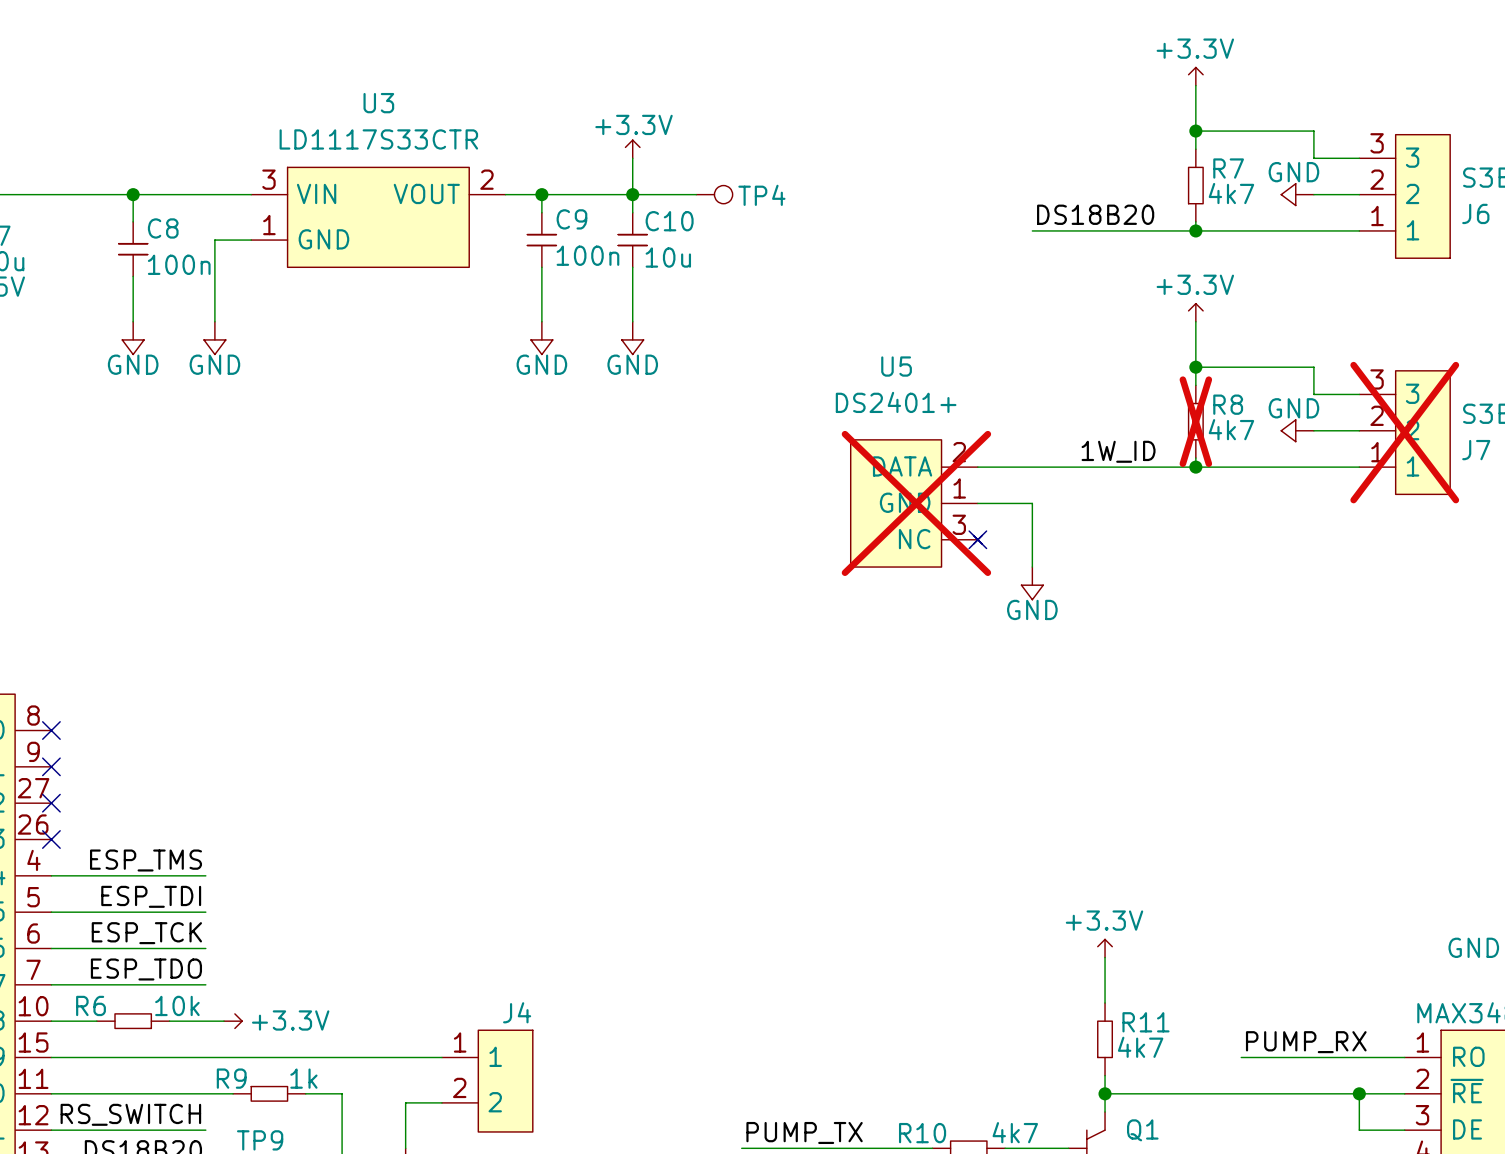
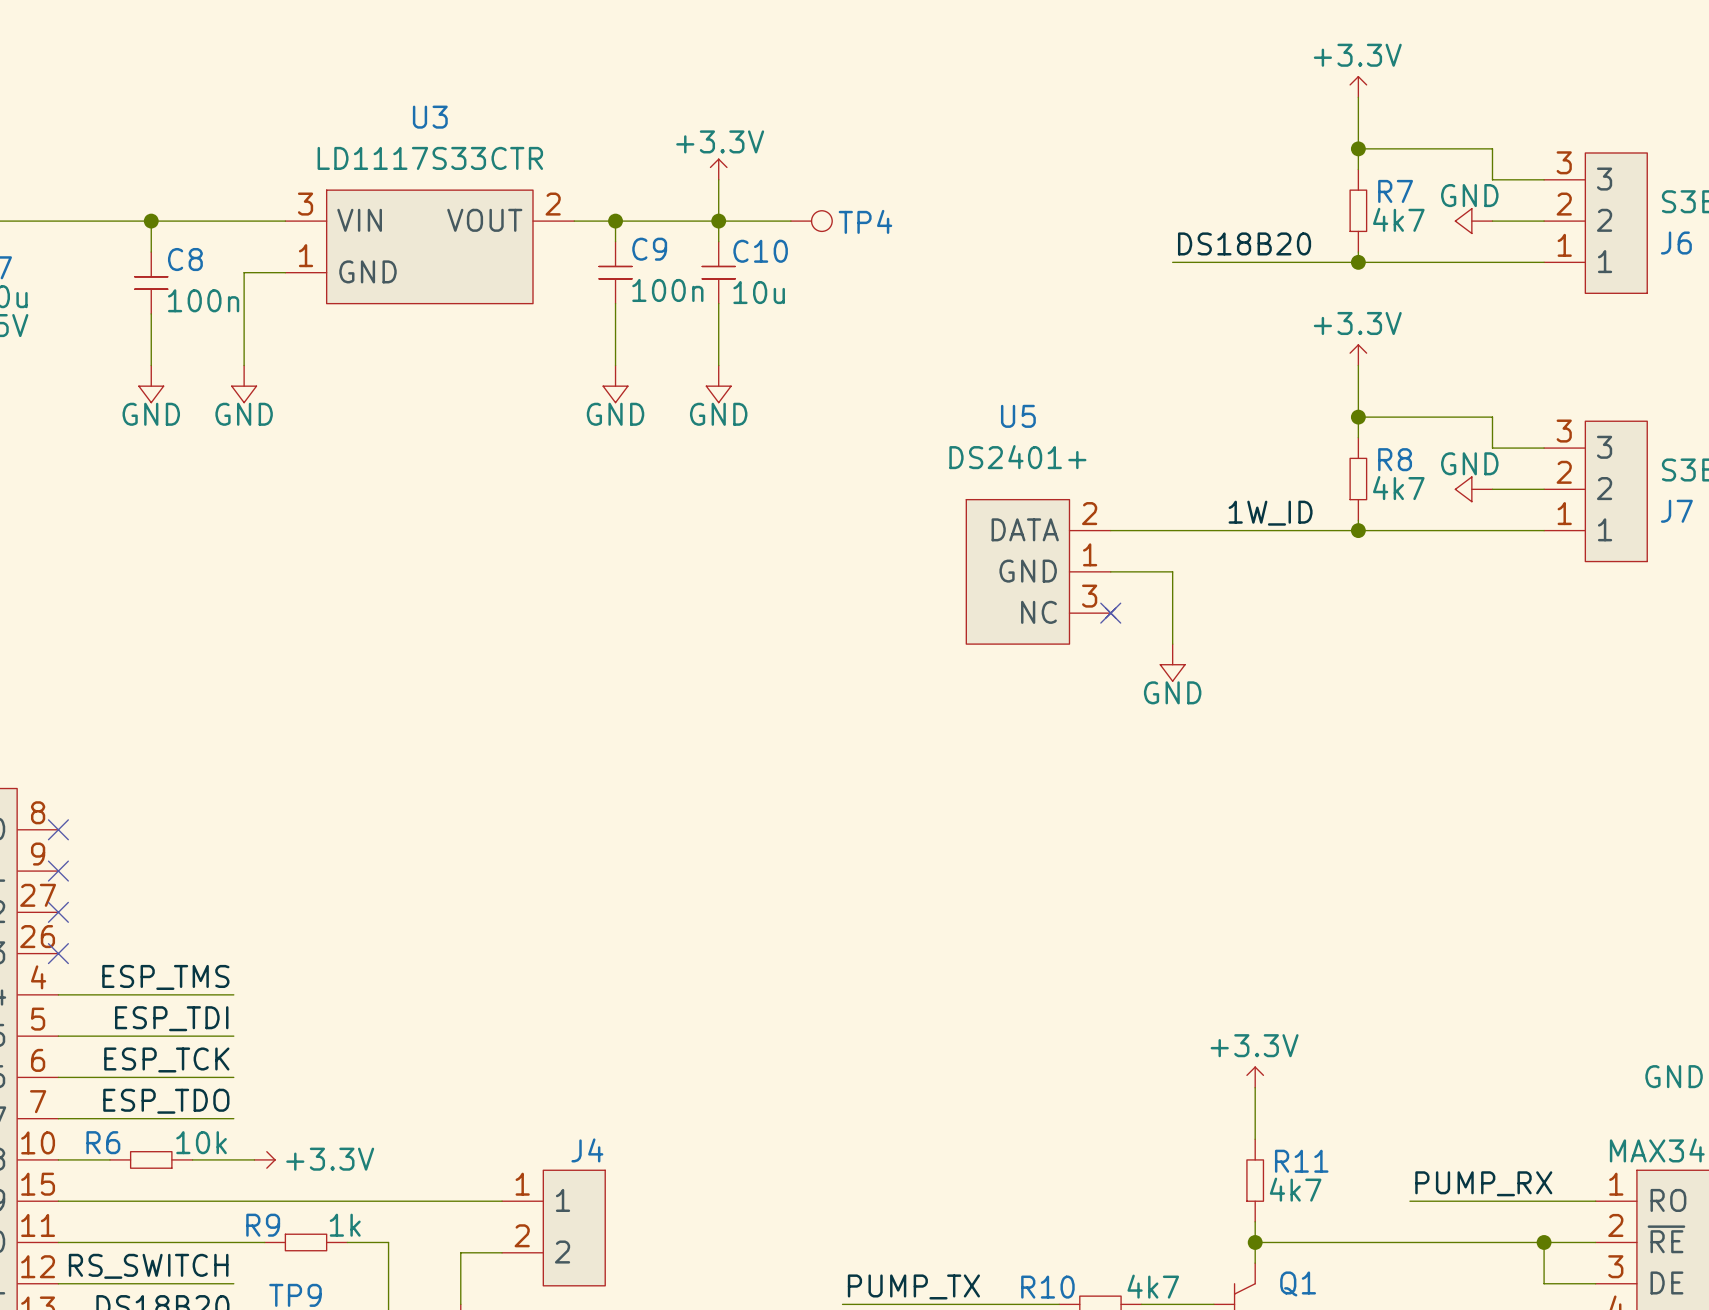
R8 do-not-place cross: (1195, 421) -> none
J7 do-not-place cross: (1404, 432) -> none
U5 do-not-place cross: (916, 503) -> none

